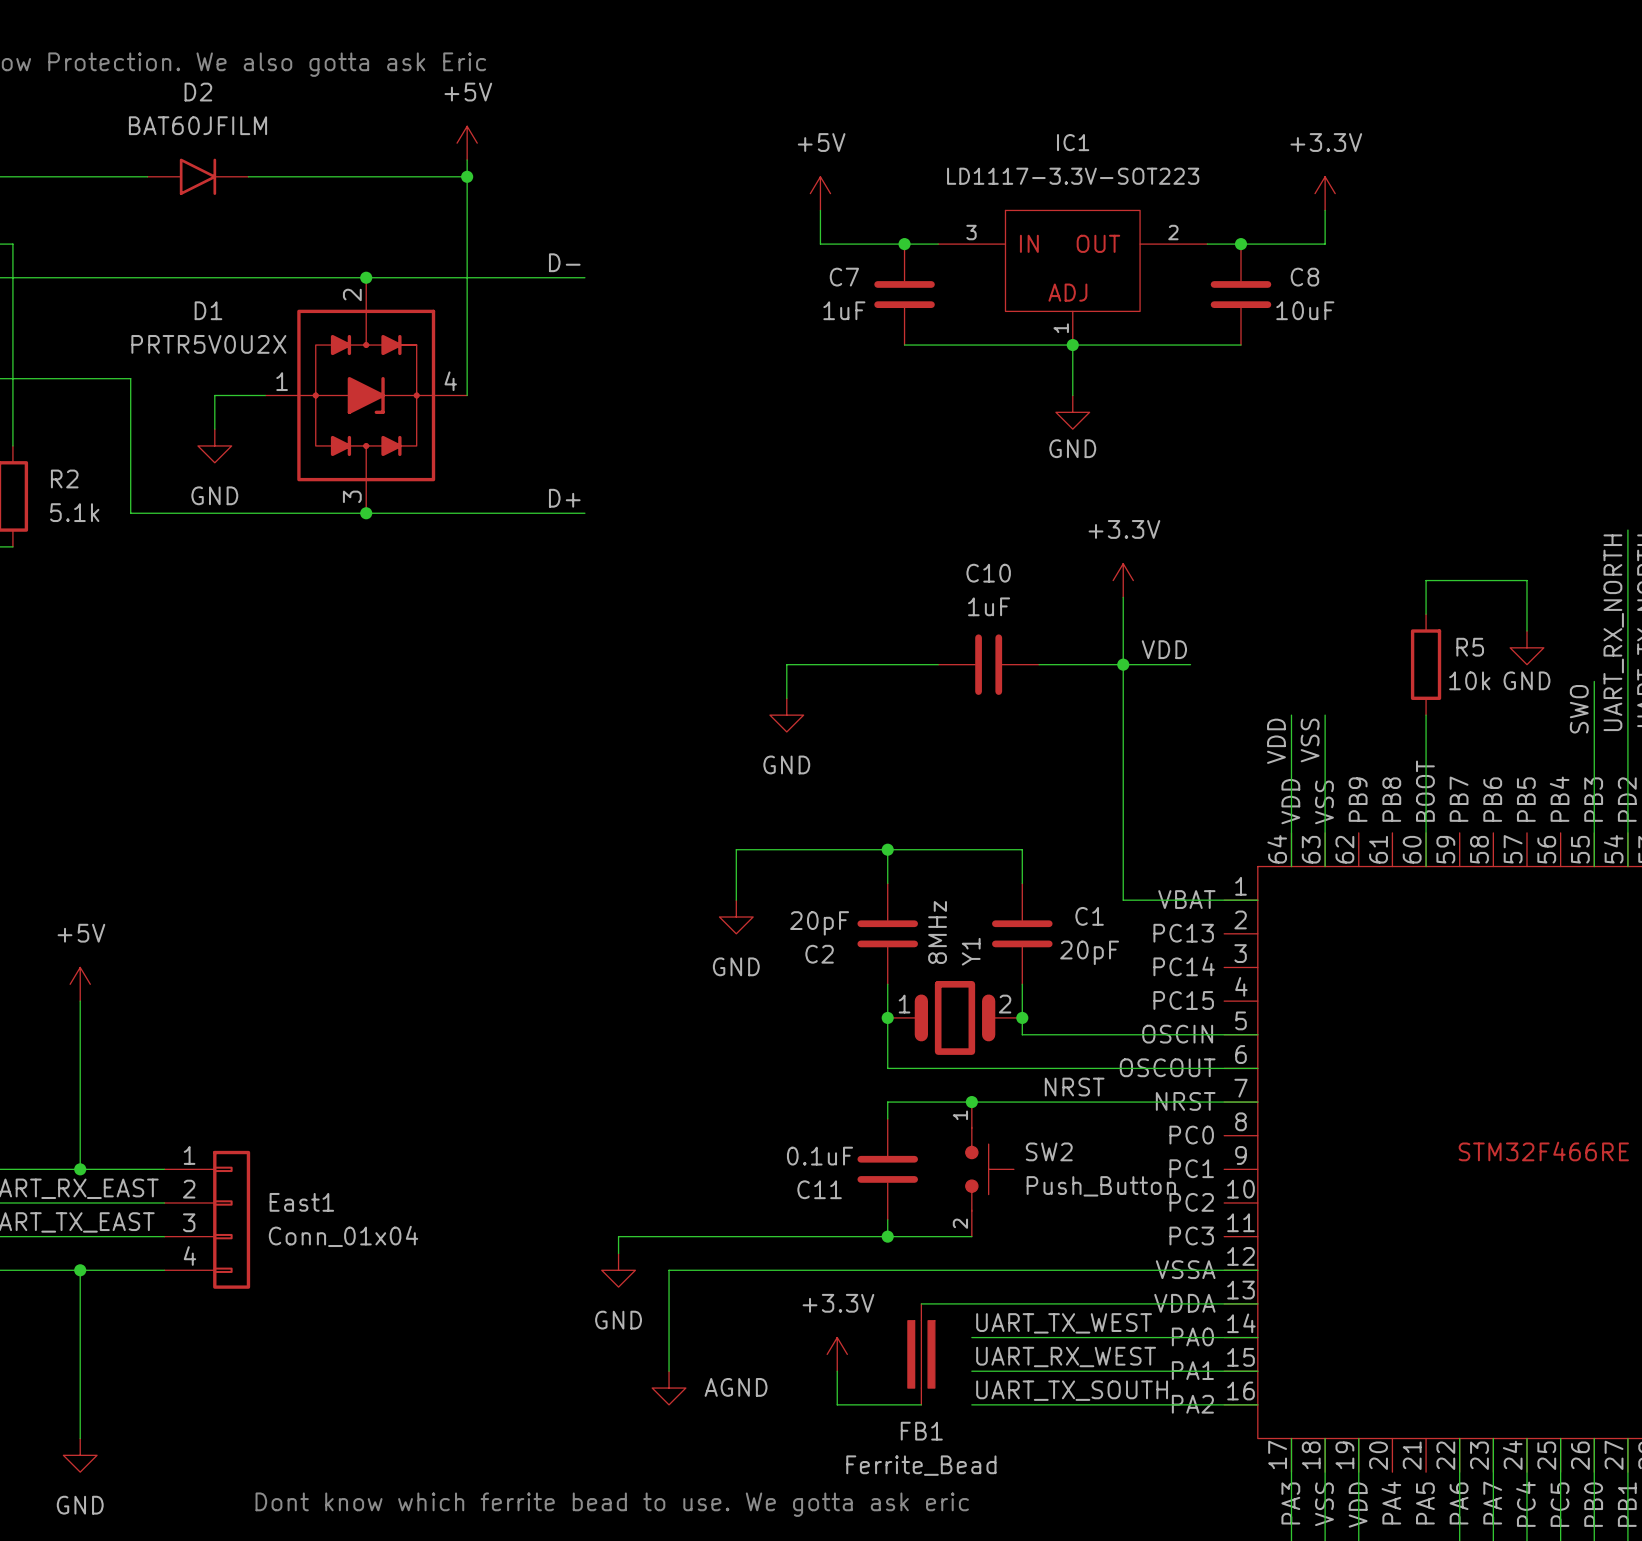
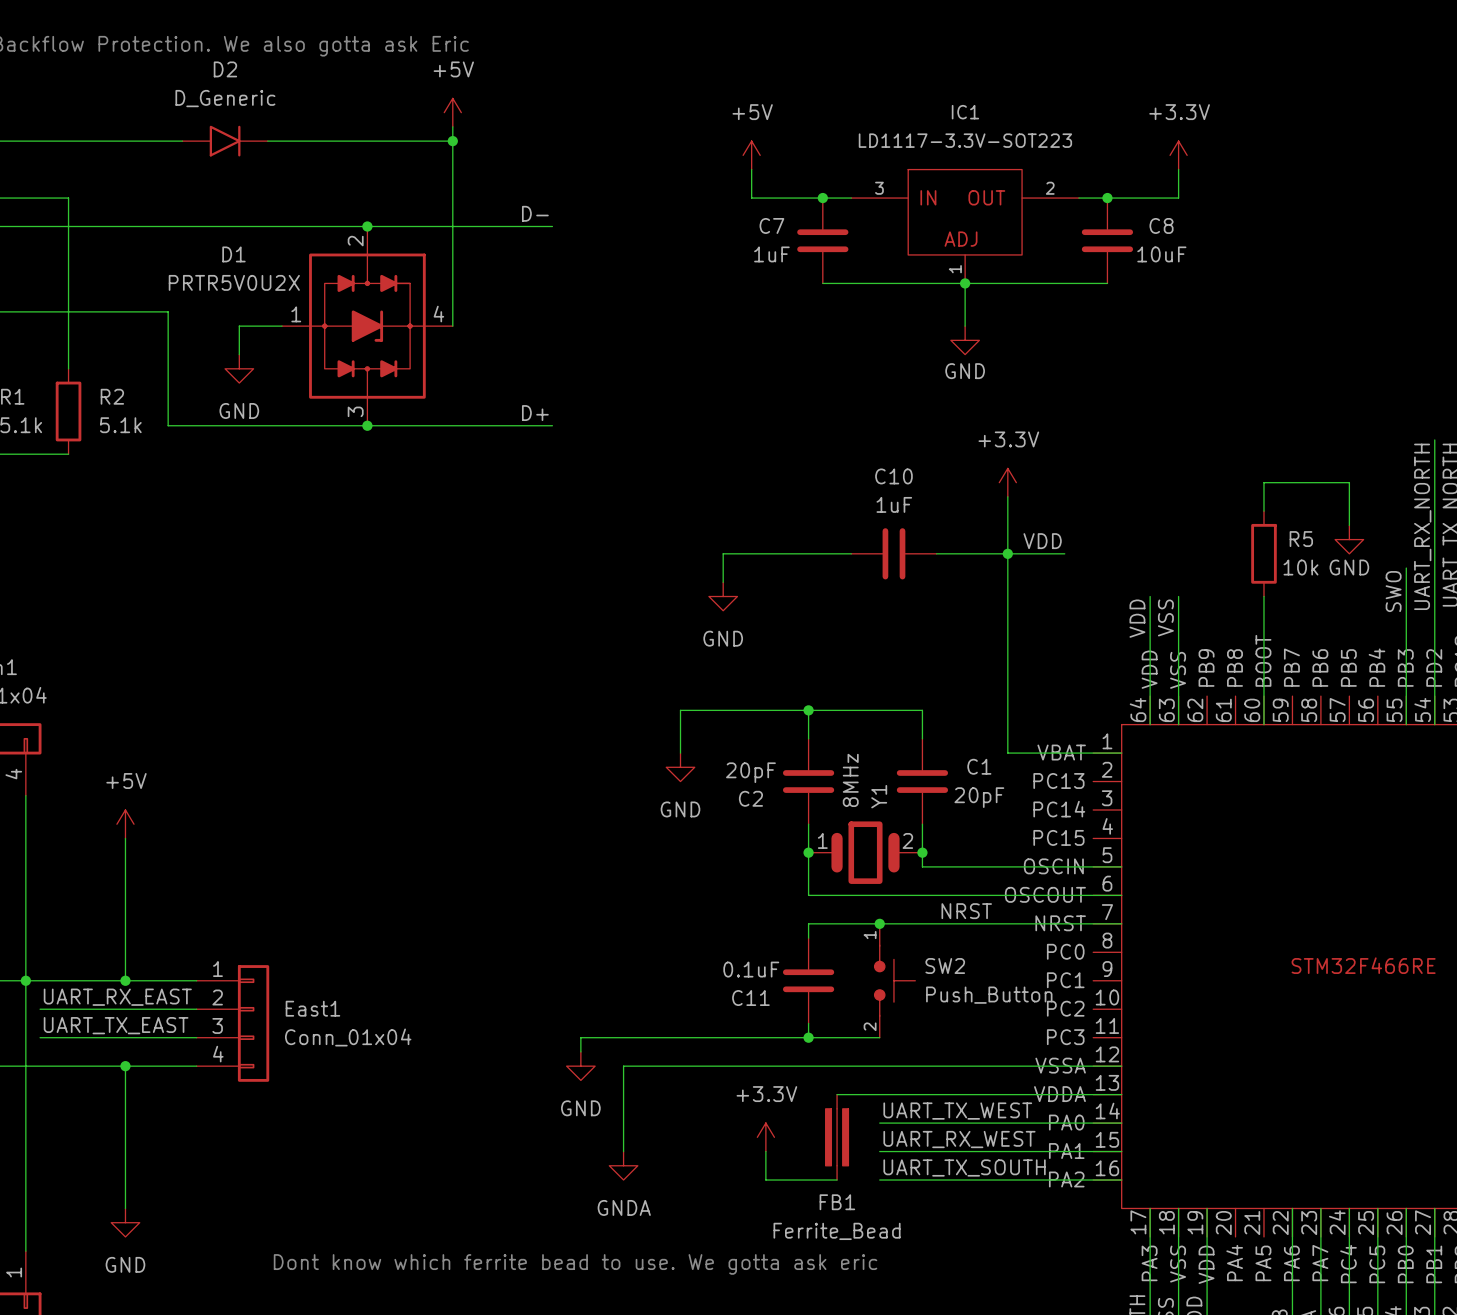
D2 value: BAT60JFILM (197, 125) -> D_Generic (225, 98)
power symbol: AGND (669, 1388) -> GNDA (623, 1165)

